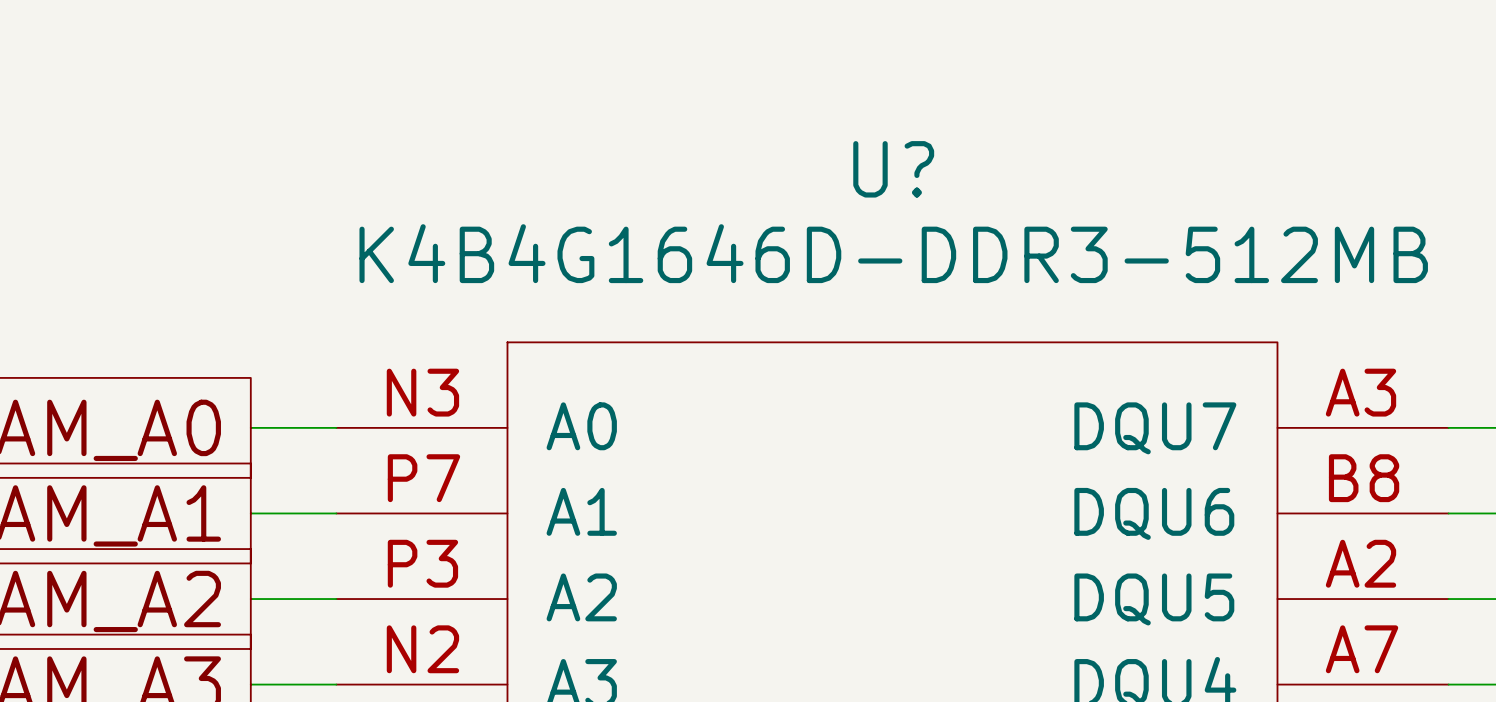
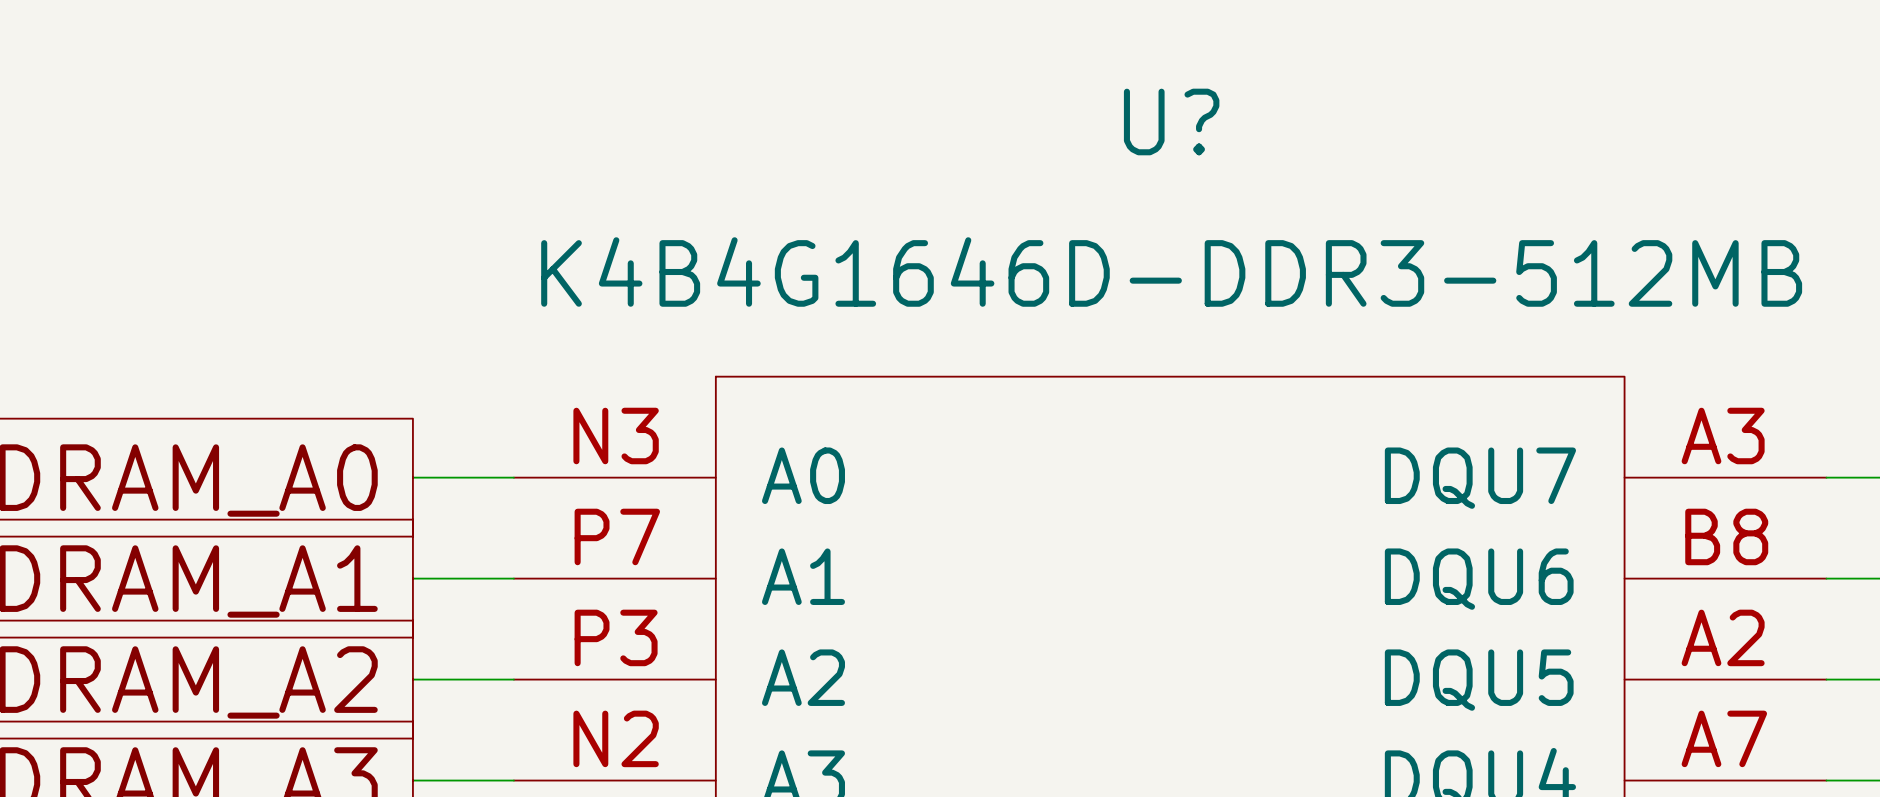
U? name position: U? (893, 169) -> U? (1171, 121)

